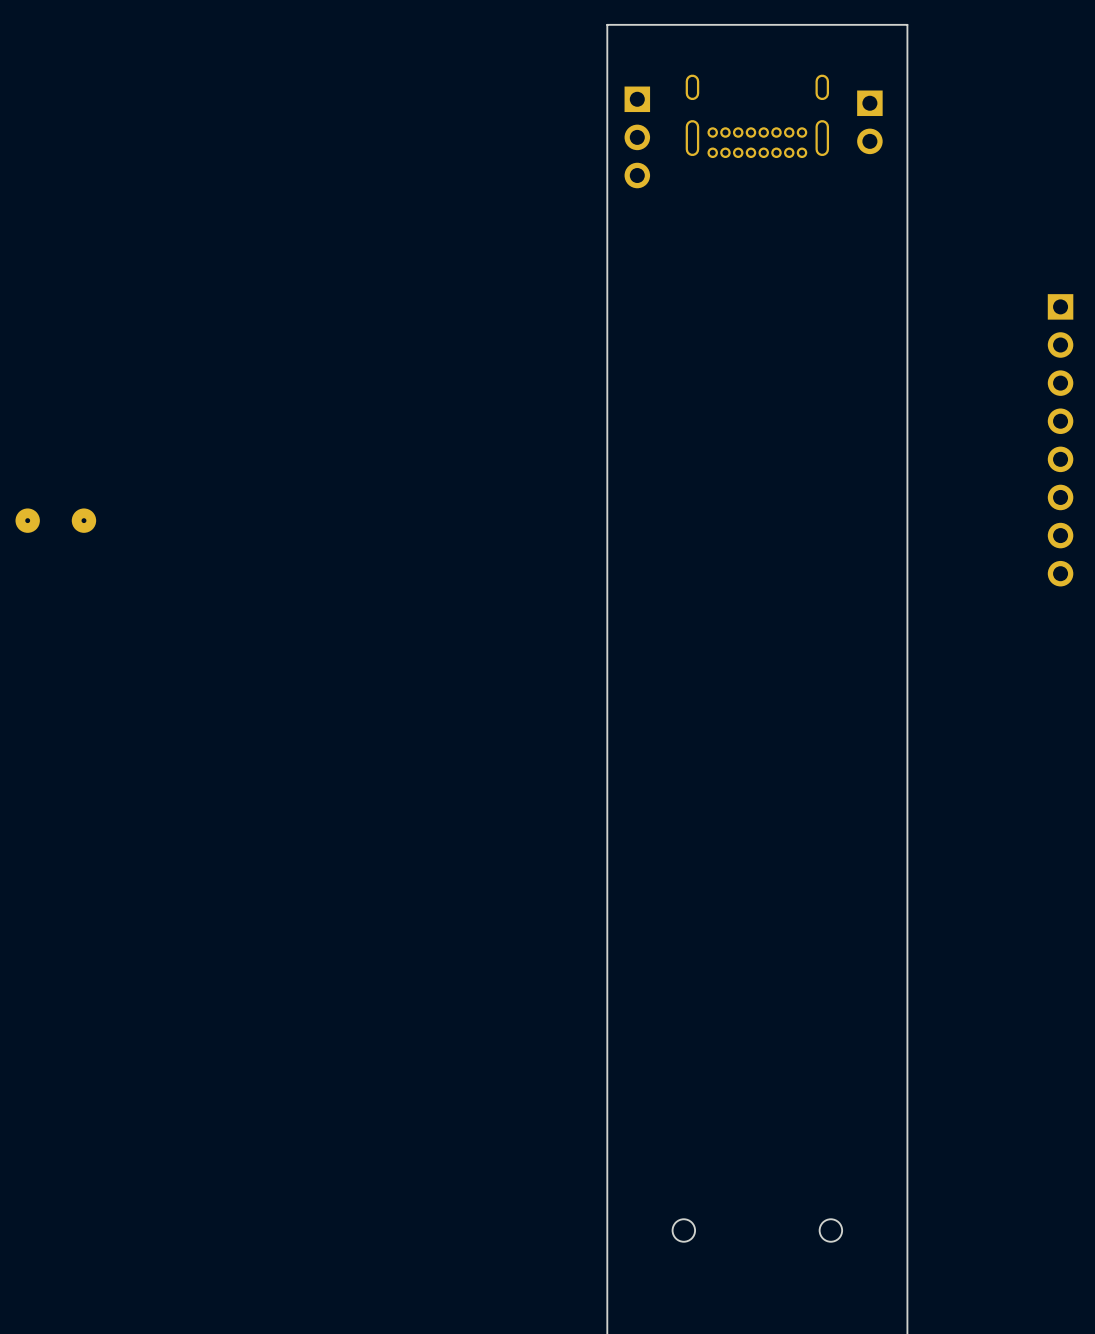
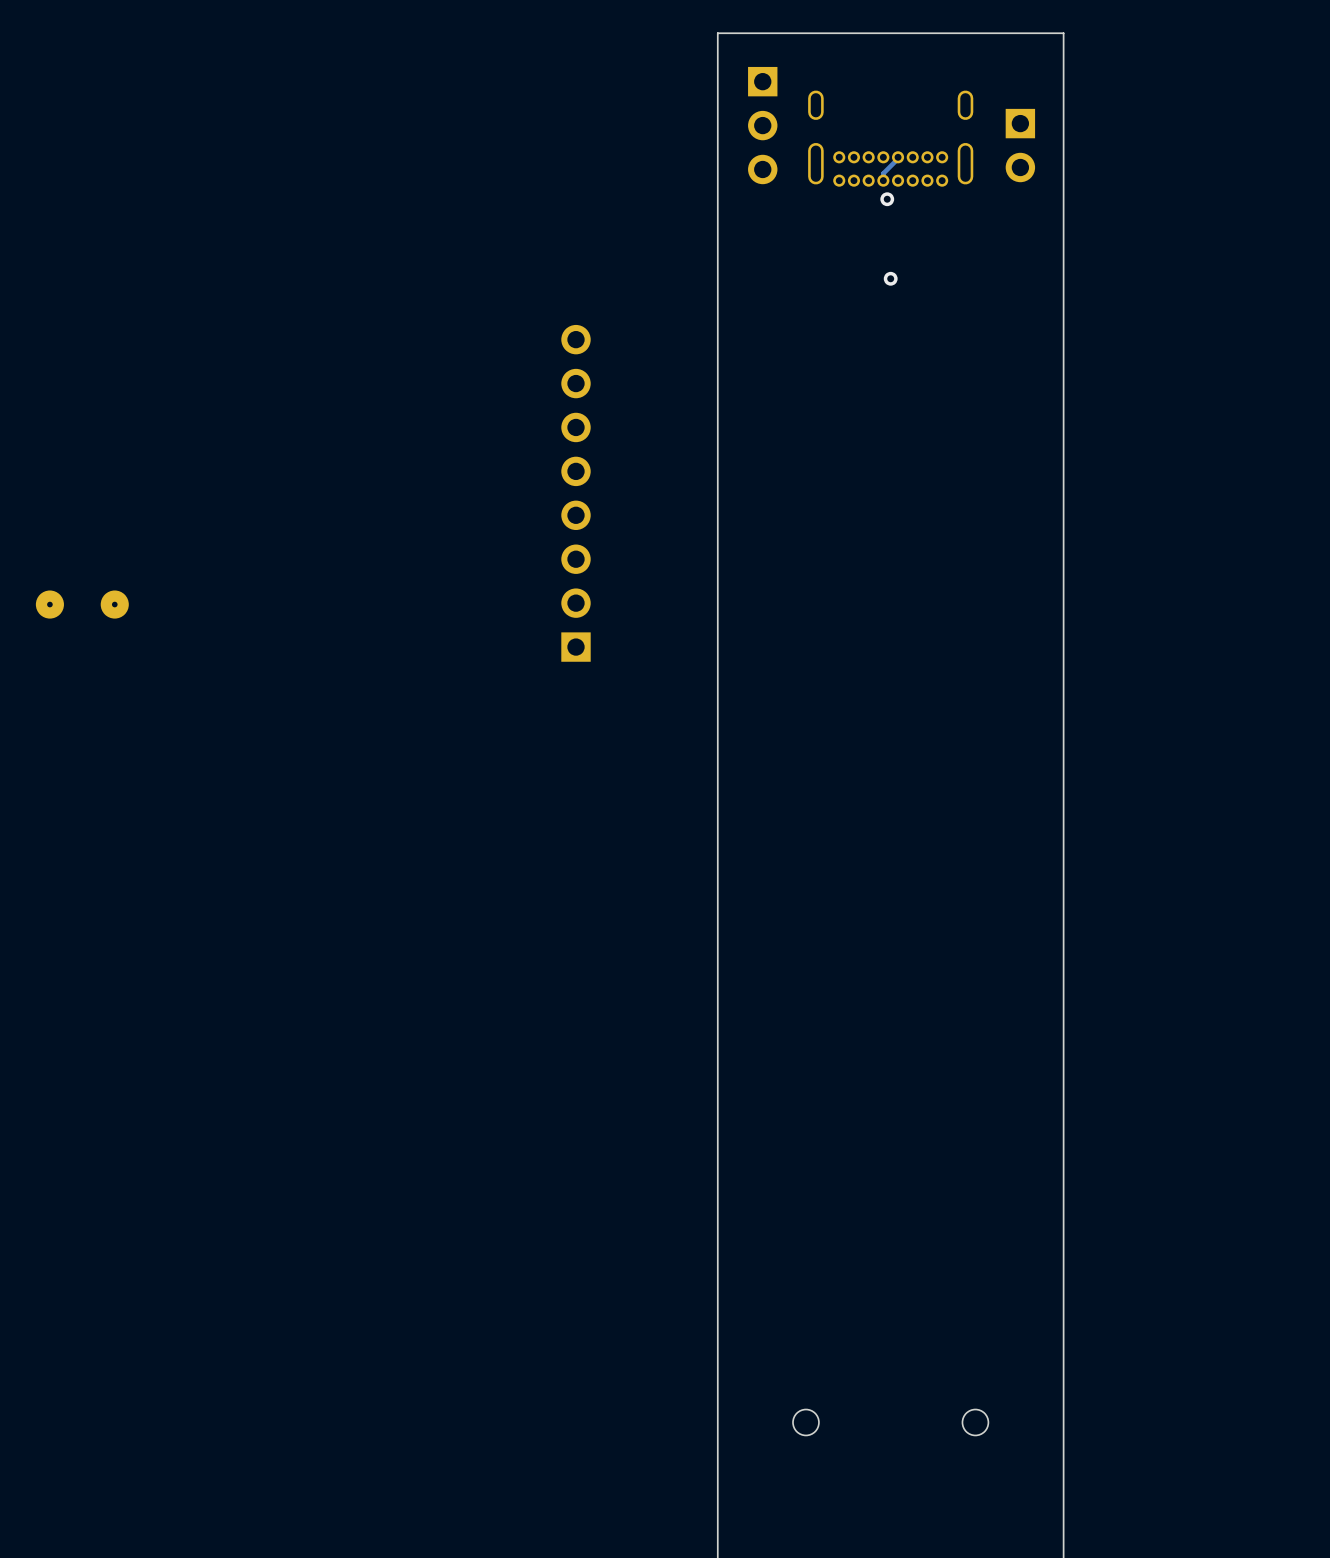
track: none -> (898, 157) (883, 173) (883, 180)
part position: (637, 137) -> (762, 125)
via: none -> (887, 199)
via: none -> (890, 278)
part: none -> (576, 493)
part: (1060, 440) -> none

